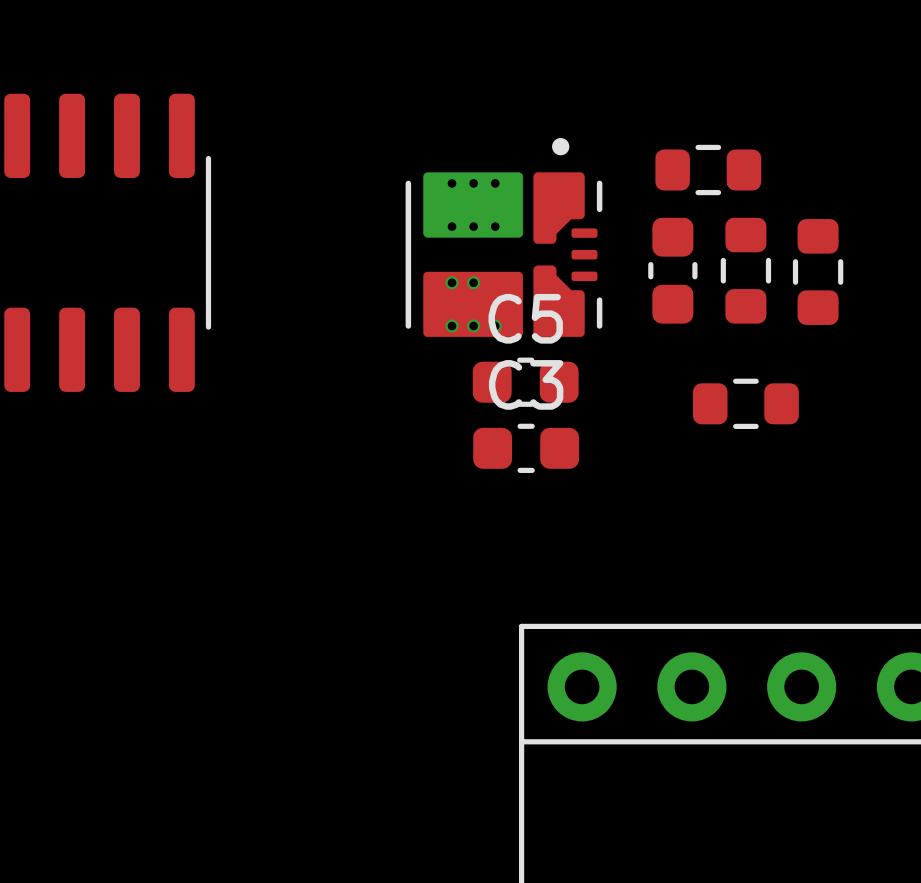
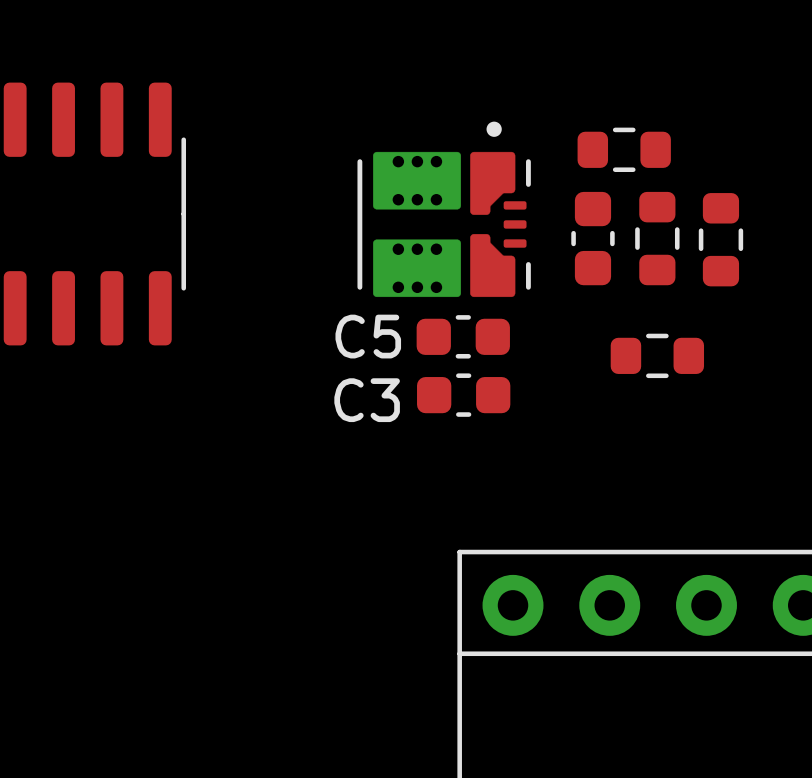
part footprint: [405, 138, 603, 338] -> [357, 121, 531, 298]
C5 name position: C5 (525, 318) -> C5 (368, 336)
C3 name position: C3 (526, 384) -> C3 (367, 400)

